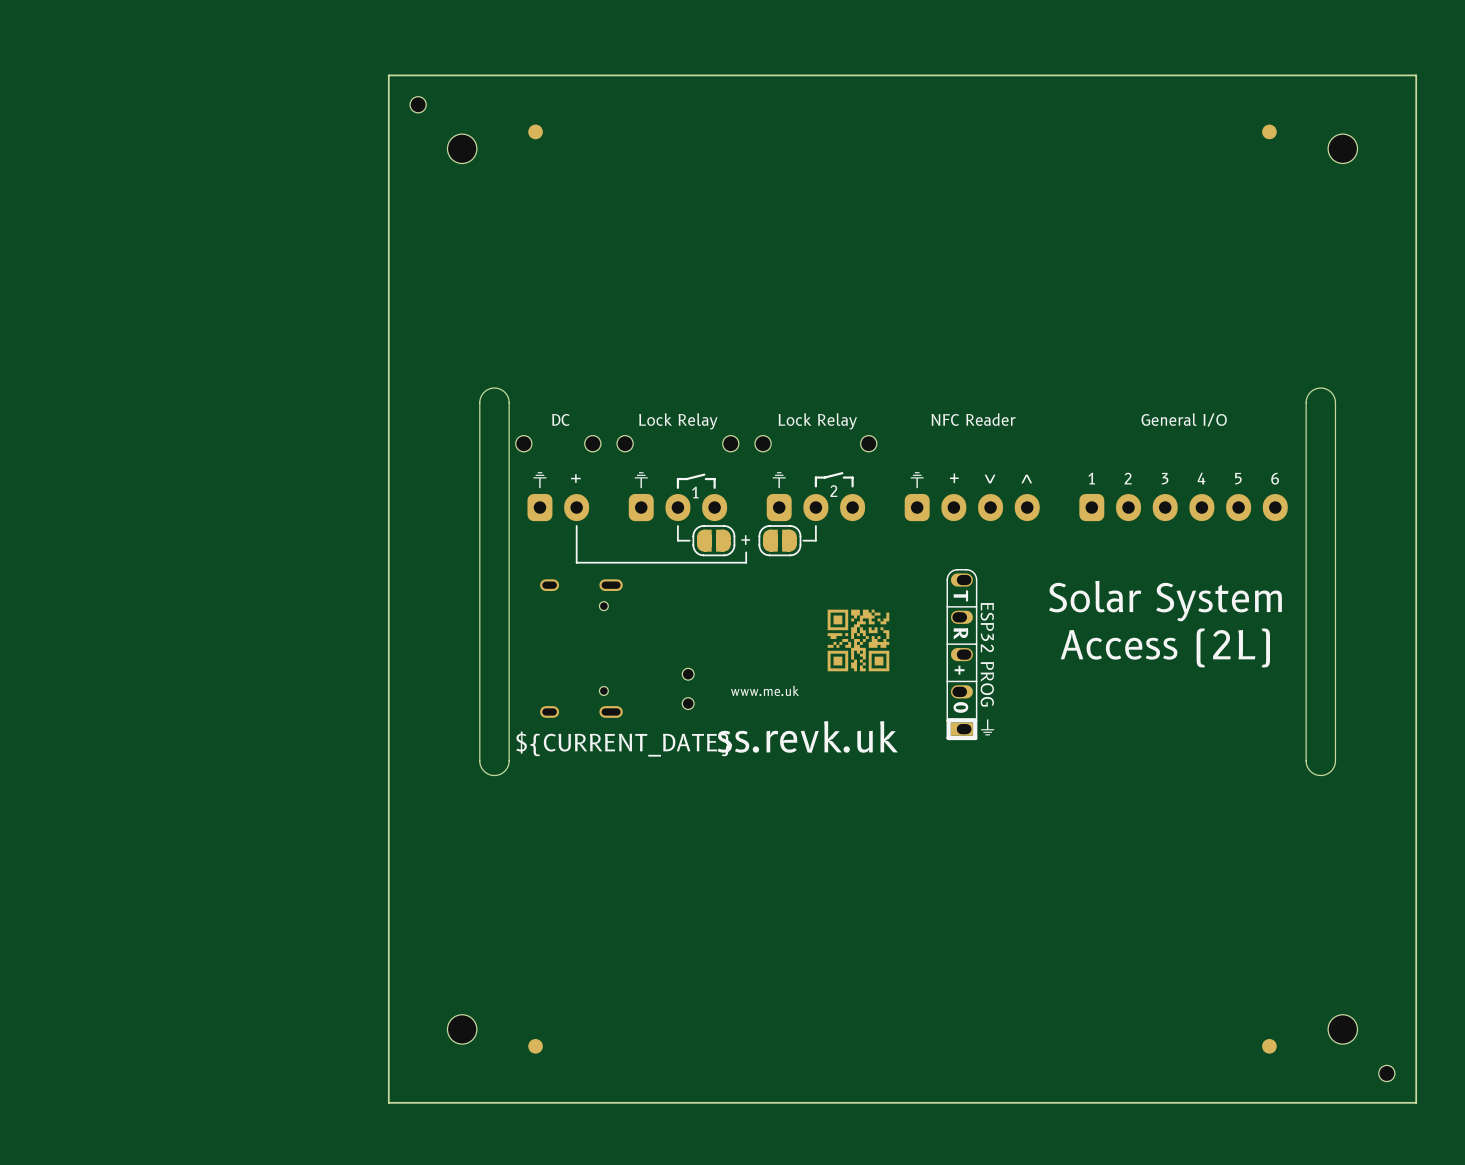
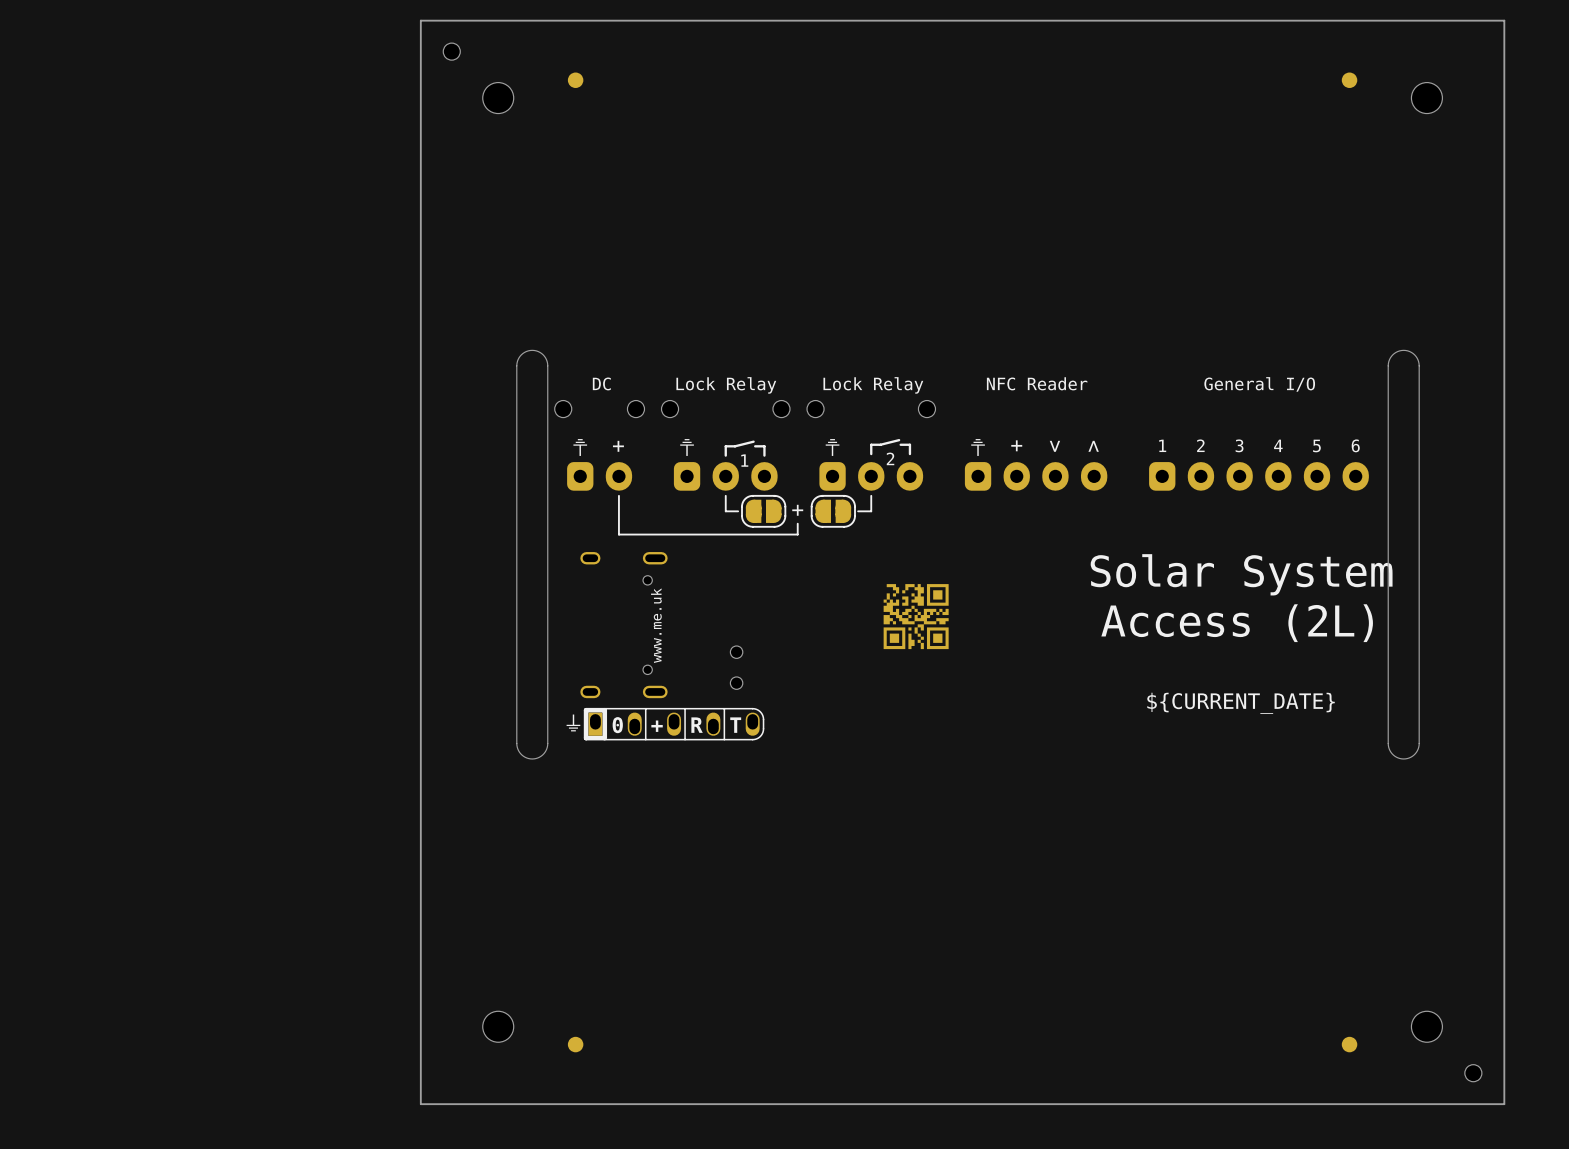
part rotation: 0° (858, 640) -> 90° counterclockwise (916, 616)
part side: bottom (961, 654) -> top (674, 724)
drawing position: (765, 690) -> (656, 625)
text: none -> ${CURRENT_DATE} (1241, 703)
text: ss.revk.uk (807, 736) -> none
text: ${CURRENT_DATE} (623, 744) -> none

